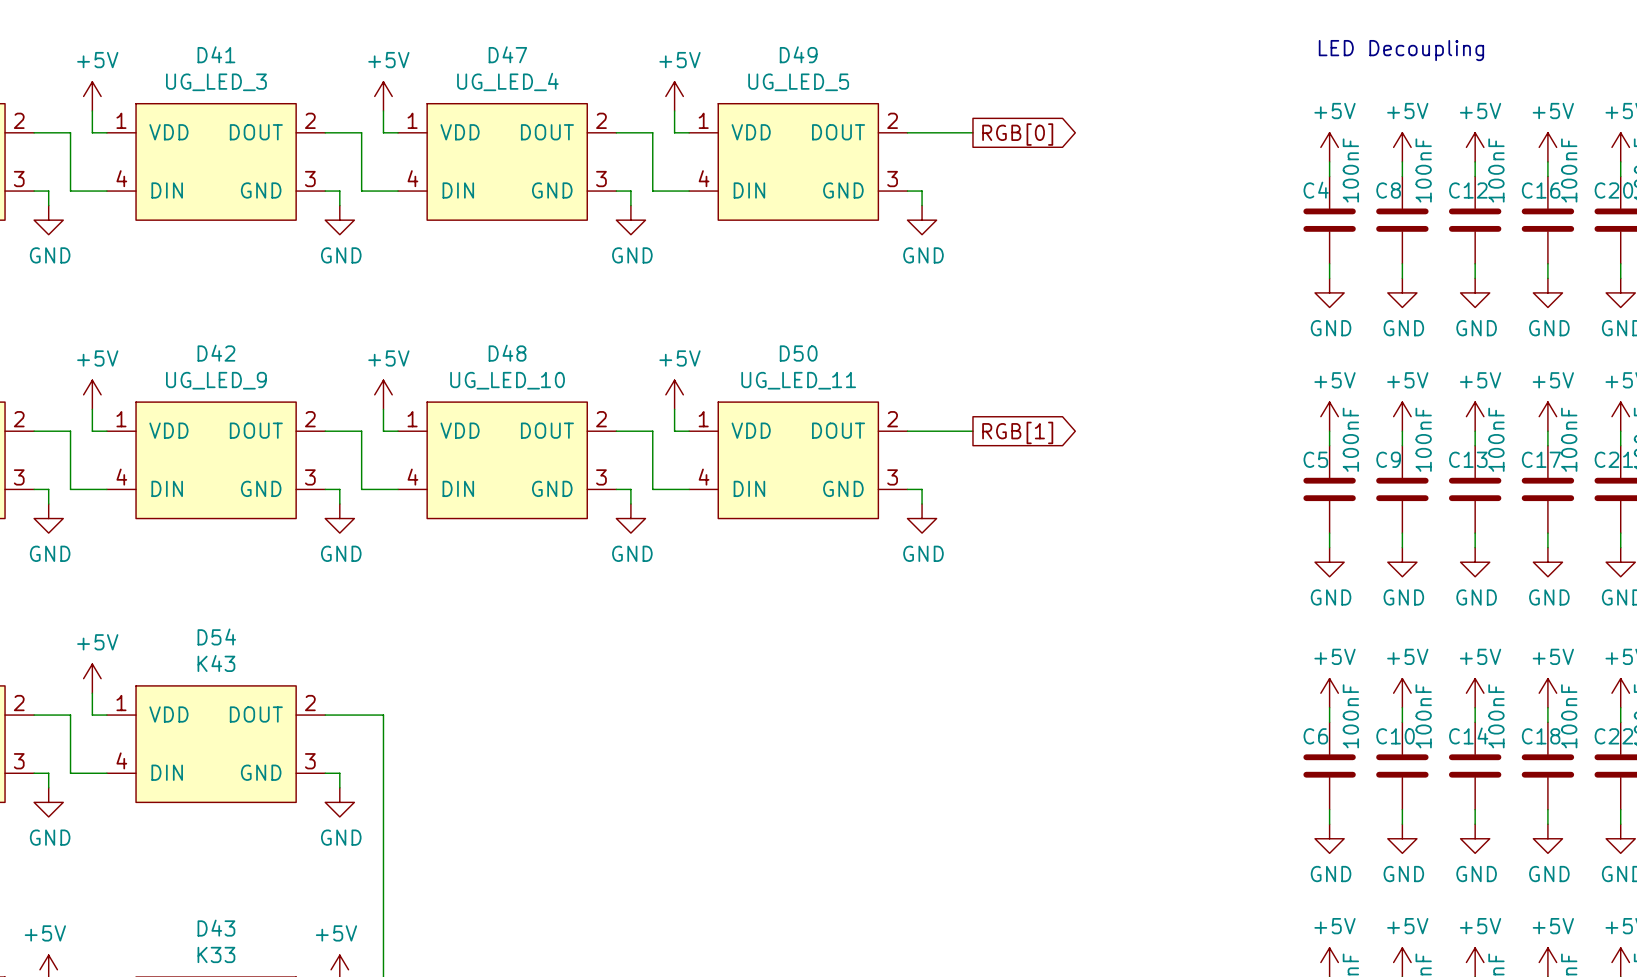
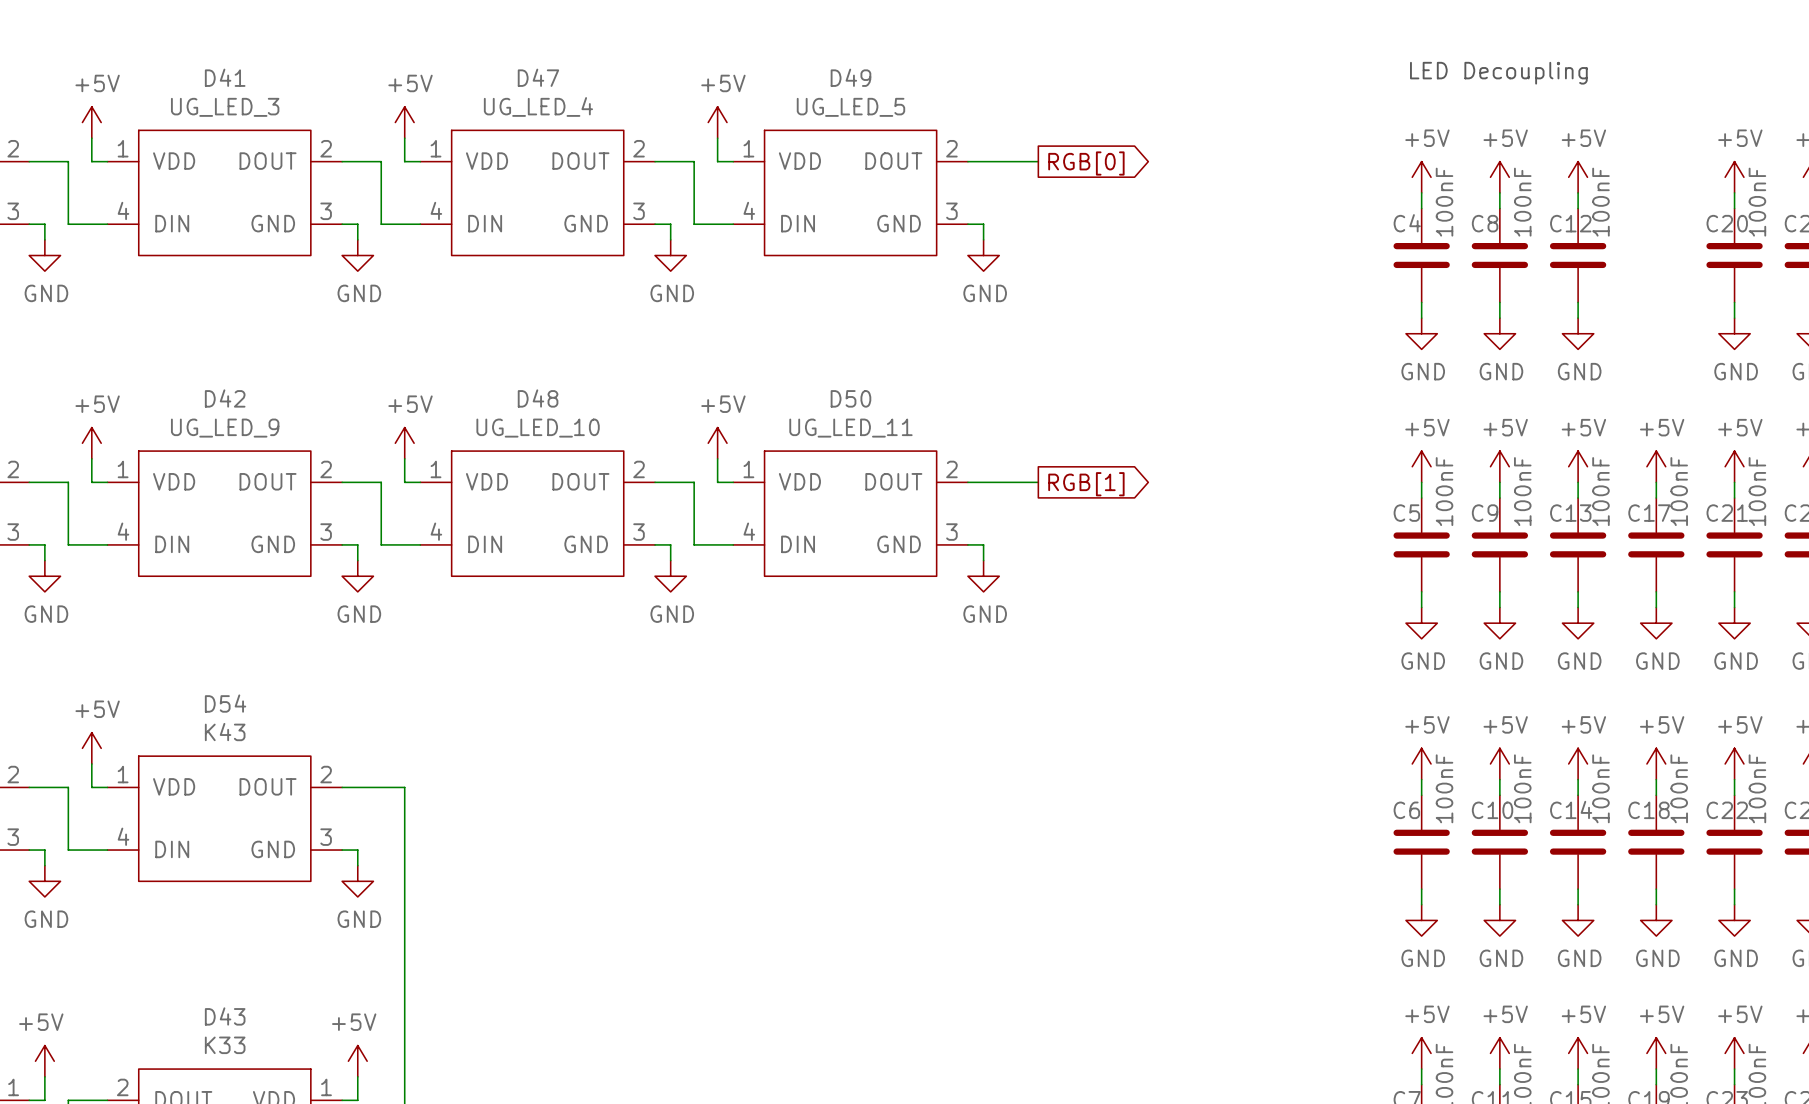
power symbol: +5V (1547, 147) -> none
wire: (1547, 161) (1547, 176) -> none
C16: 100nF (1547, 220) -> none
wire: (1547, 263) (1547, 278) -> none
power symbol: GND (1547, 292) -> none

